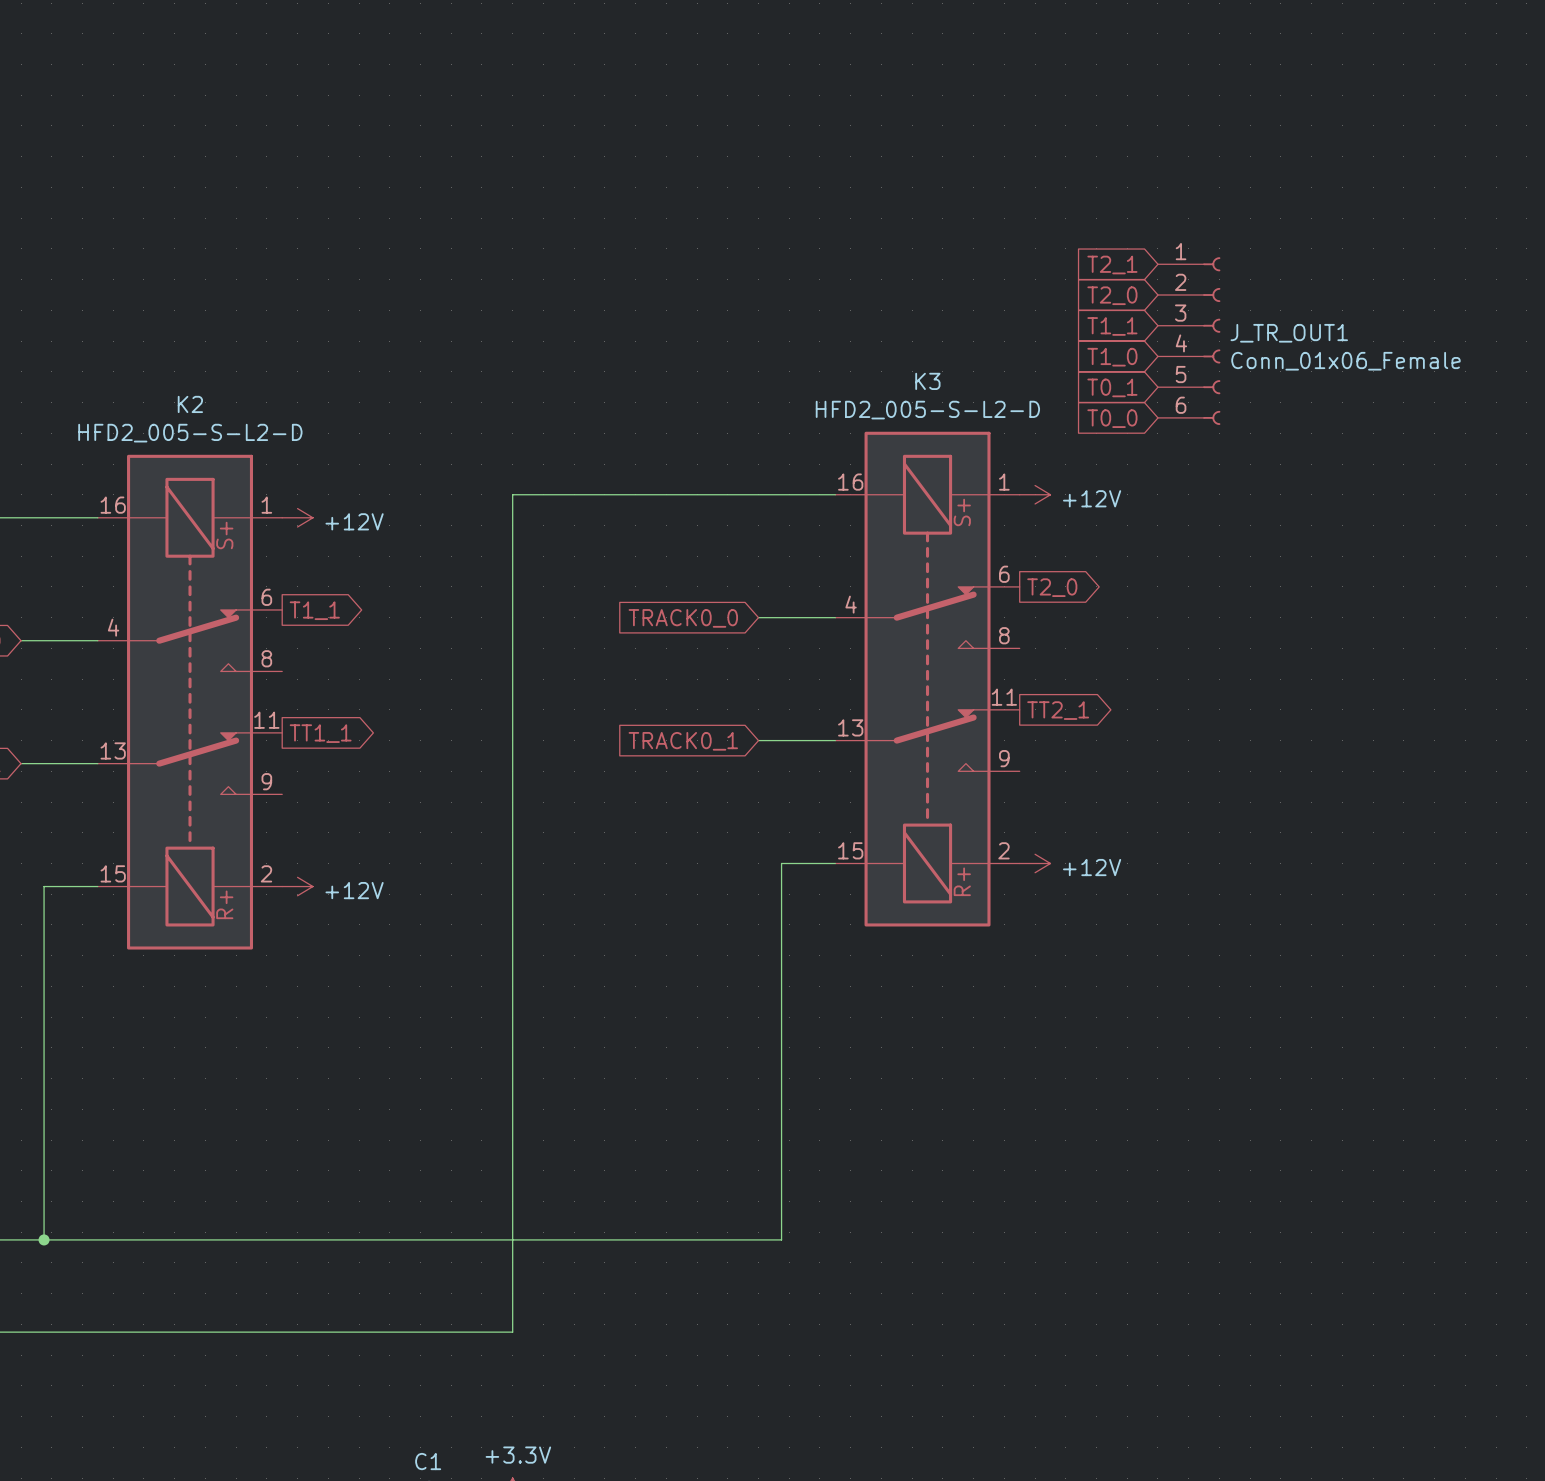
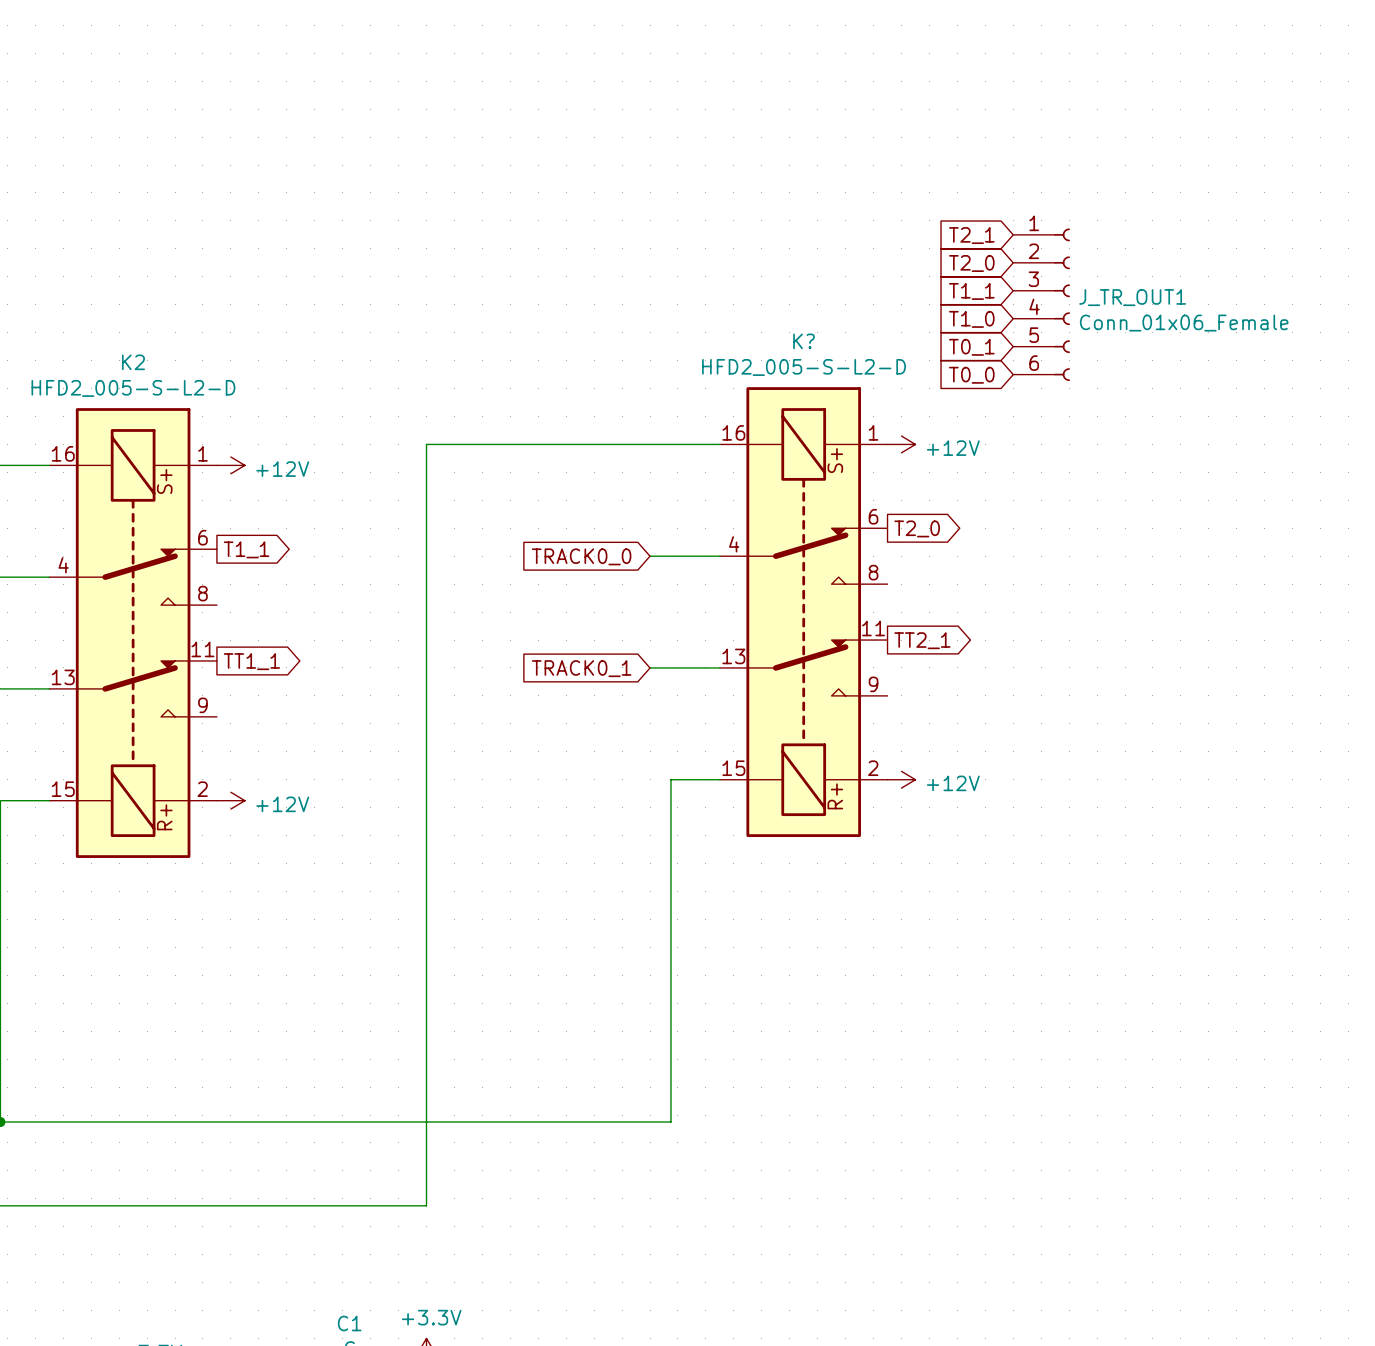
K3 name: K3 (927, 381) -> K? (804, 341)

